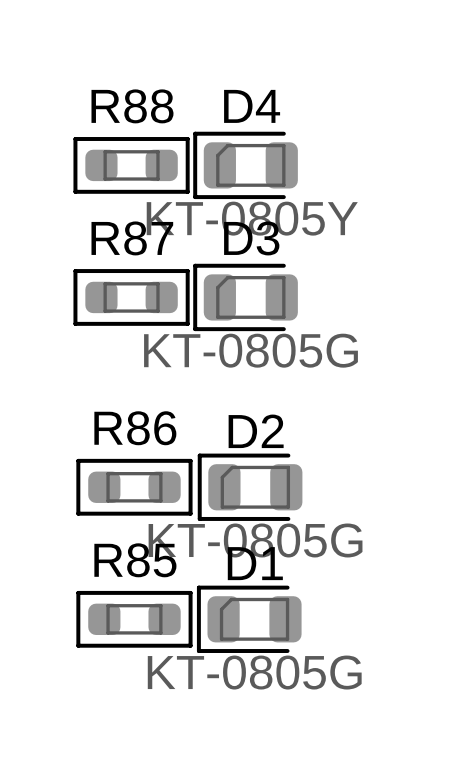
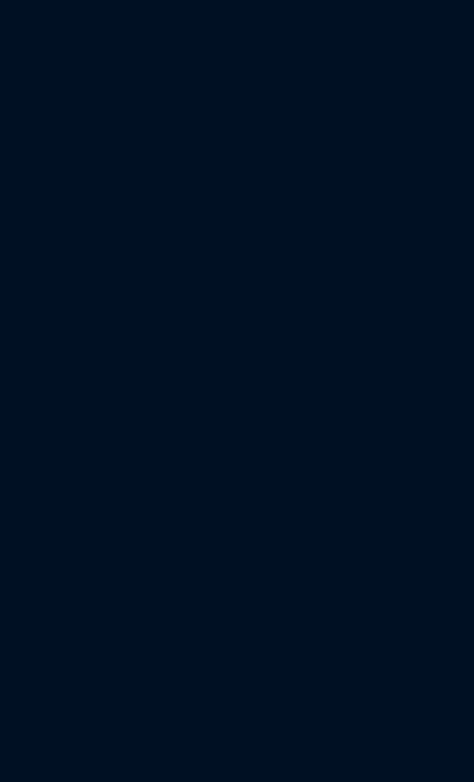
R88: (131, 165) -> none
D4: KT-0805Y (245, 165) -> none
R87: (131, 297) -> none
D3: KT-0805G (245, 297) -> none
R86: (134, 487) -> none
D2: KT-0805G (250, 487) -> none
R85: (134, 619) -> none
D1: KT-0805G (249, 619) -> none

